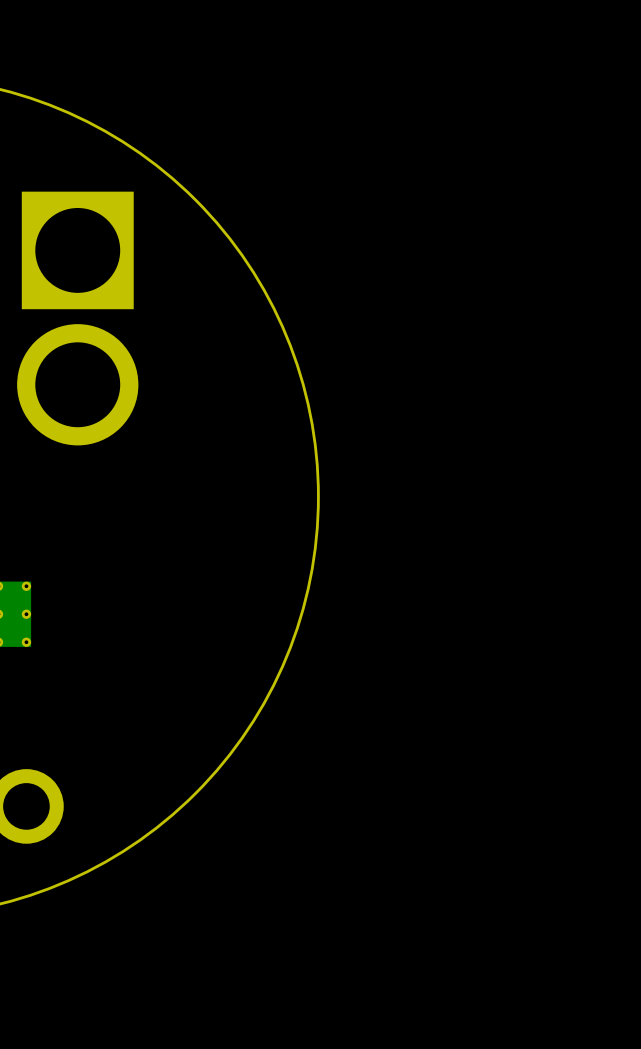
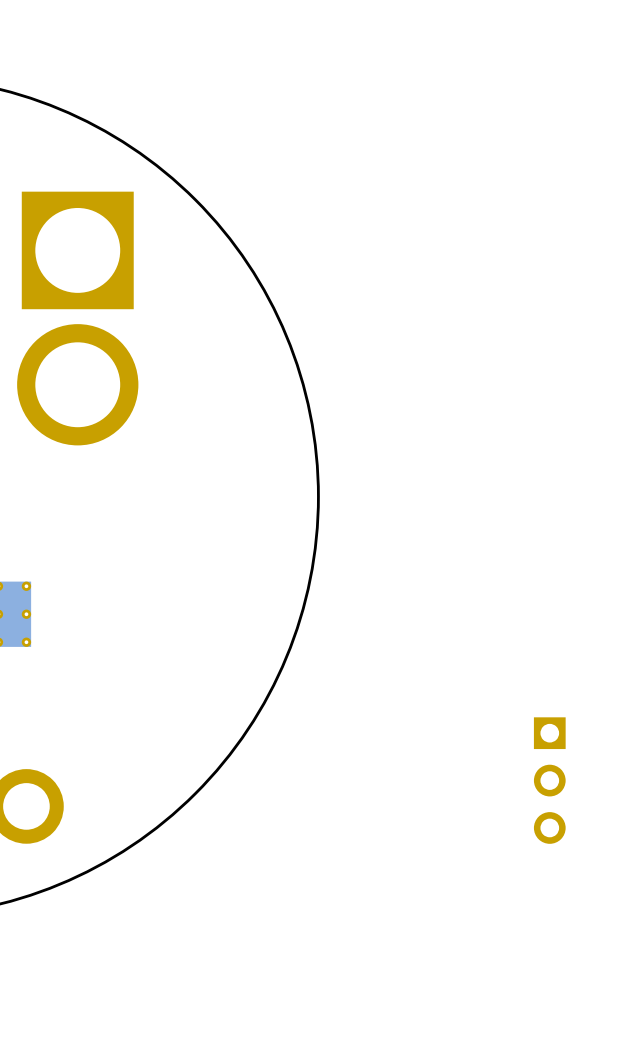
part: none -> (549, 780)

